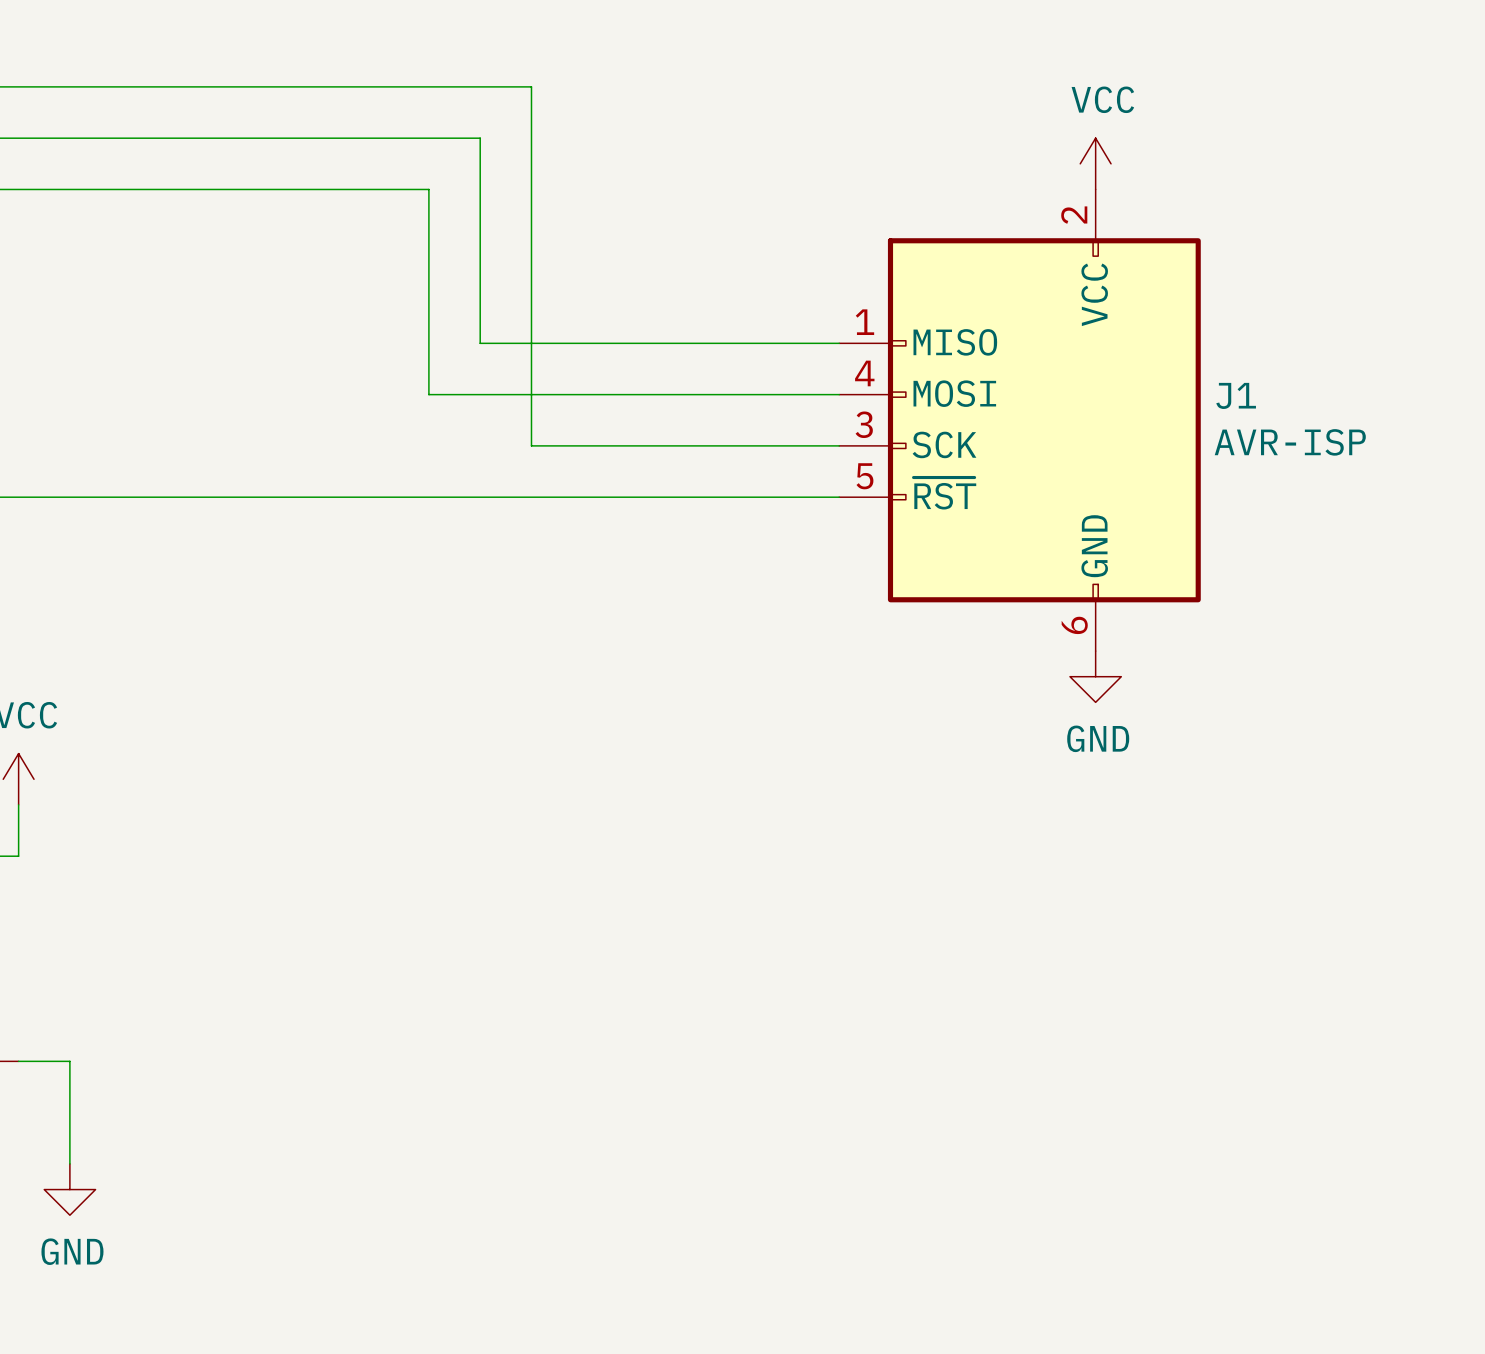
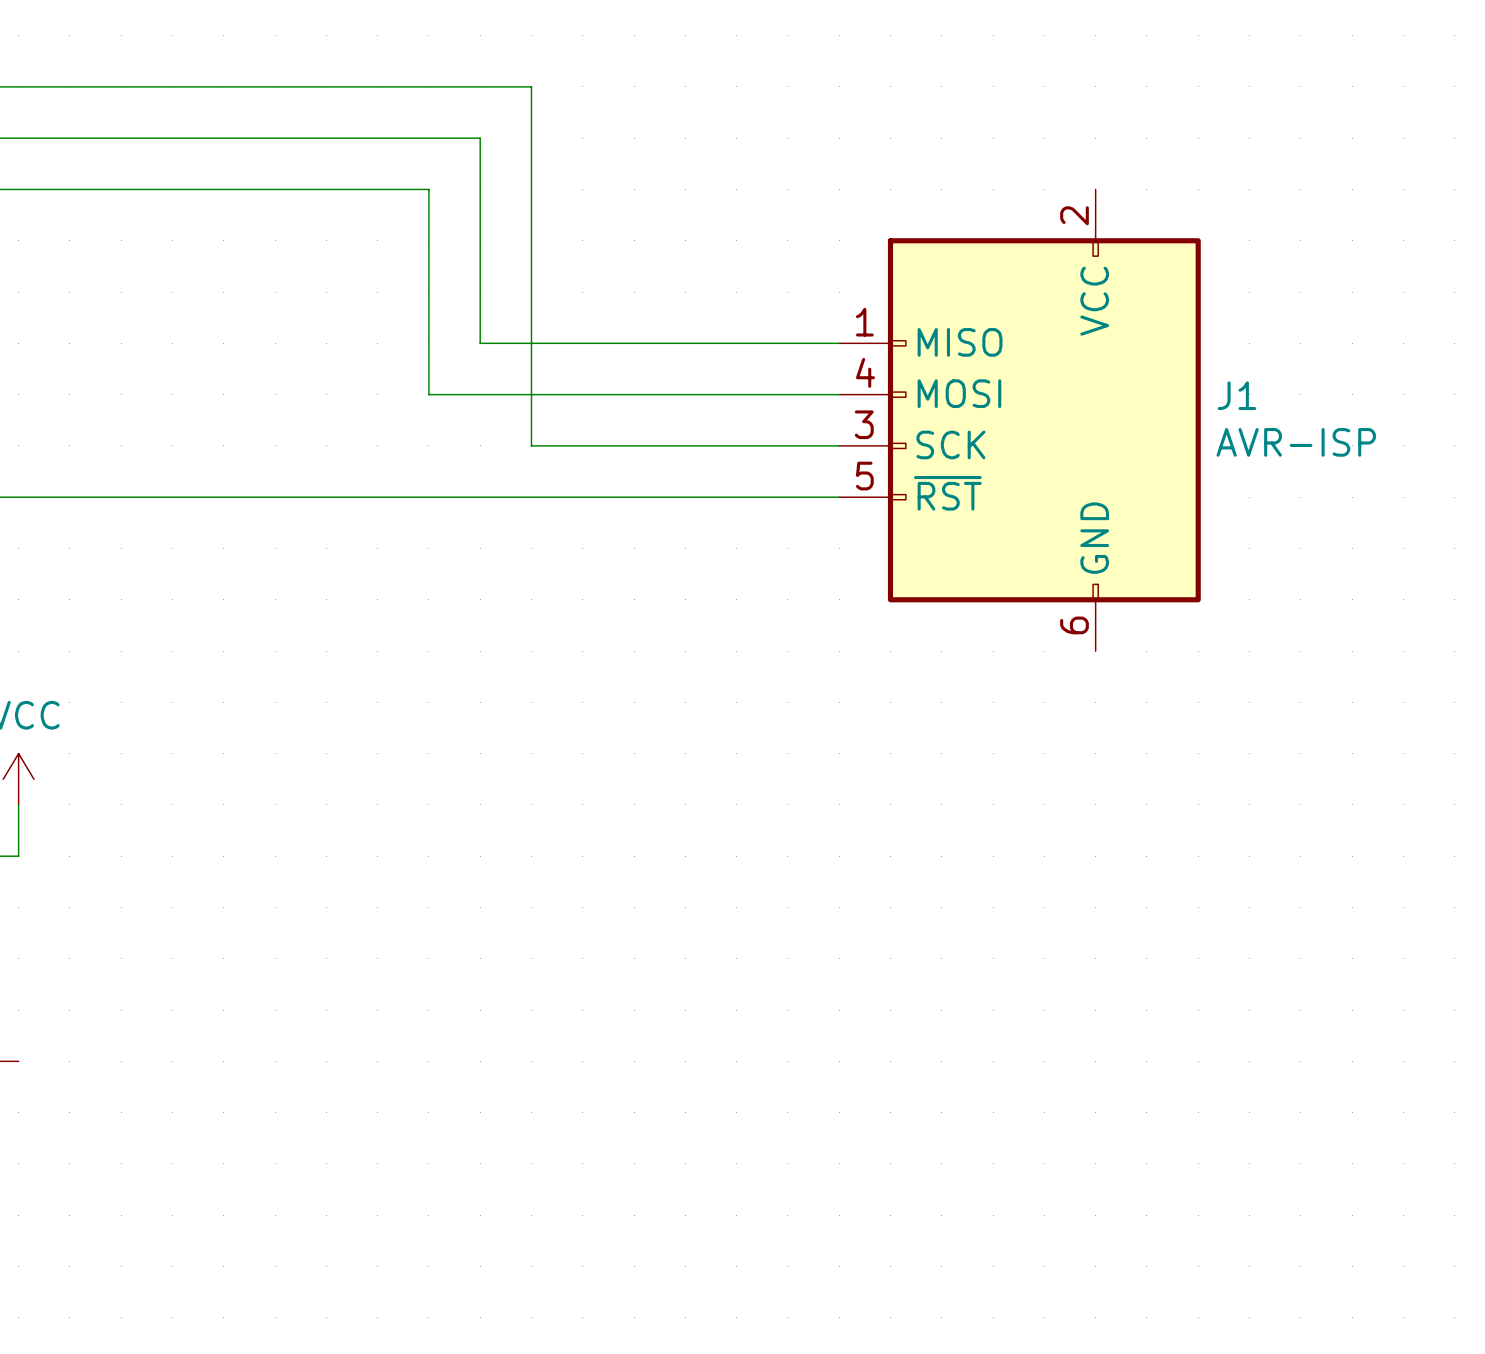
power symbol: VCC (1095, 163) -> none
power symbol: GND (1095, 676) -> none
wire: (18, 1061) (69, 1061) (69, 1163) -> none
power symbol: GND (69, 1189) -> none

